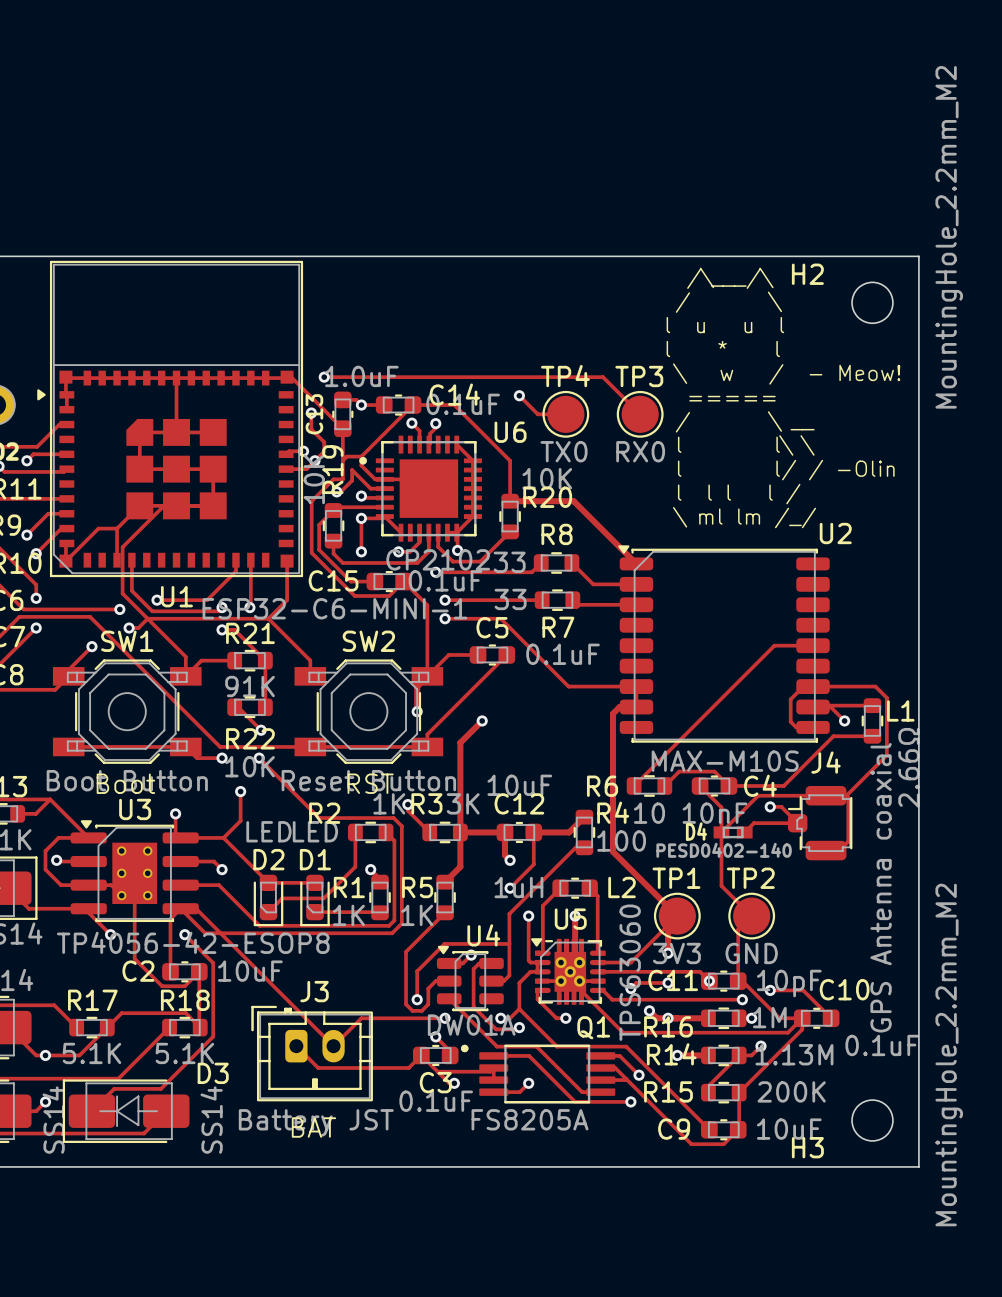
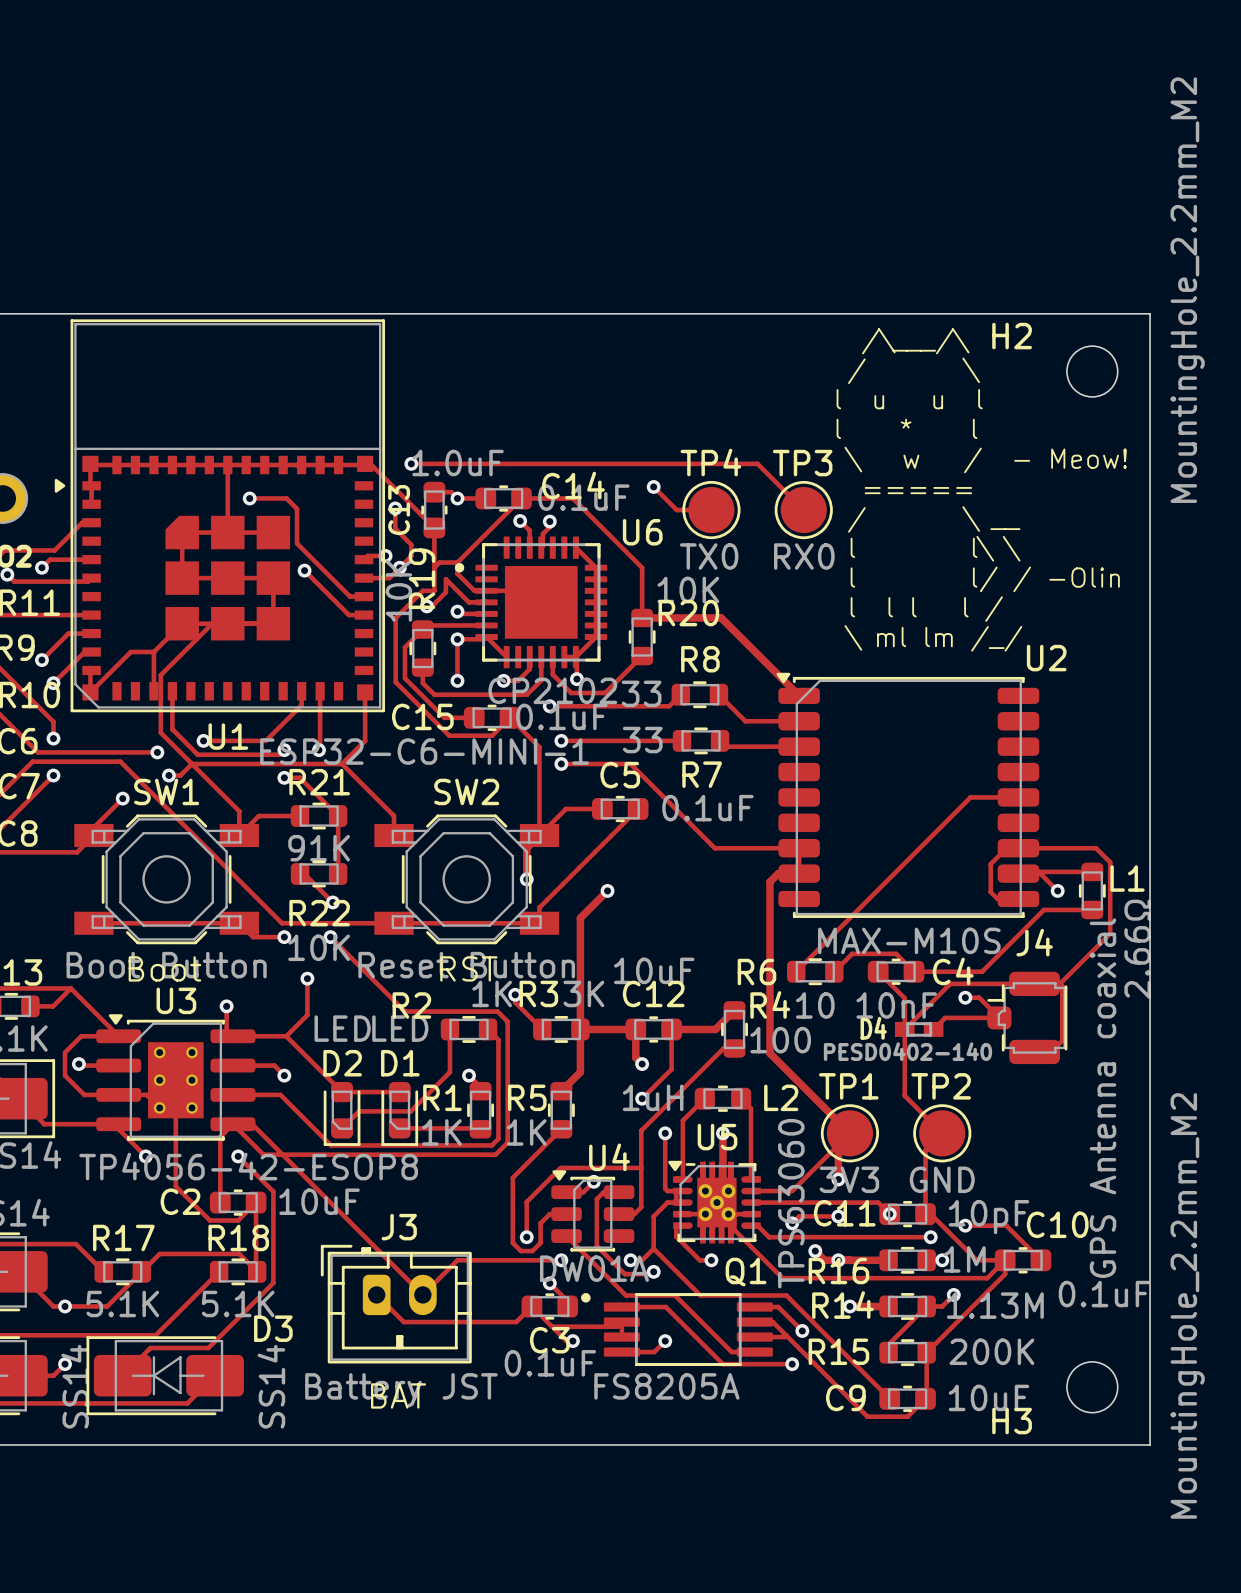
track: none -> (249, 498) (286, 498) (297, 508) (297, 543) (350, 596) (363, 596)
via: none -> (249, 498)
track: none -> (304, 570) (349, 615) (363, 615)
via: none -> (304, 570)

